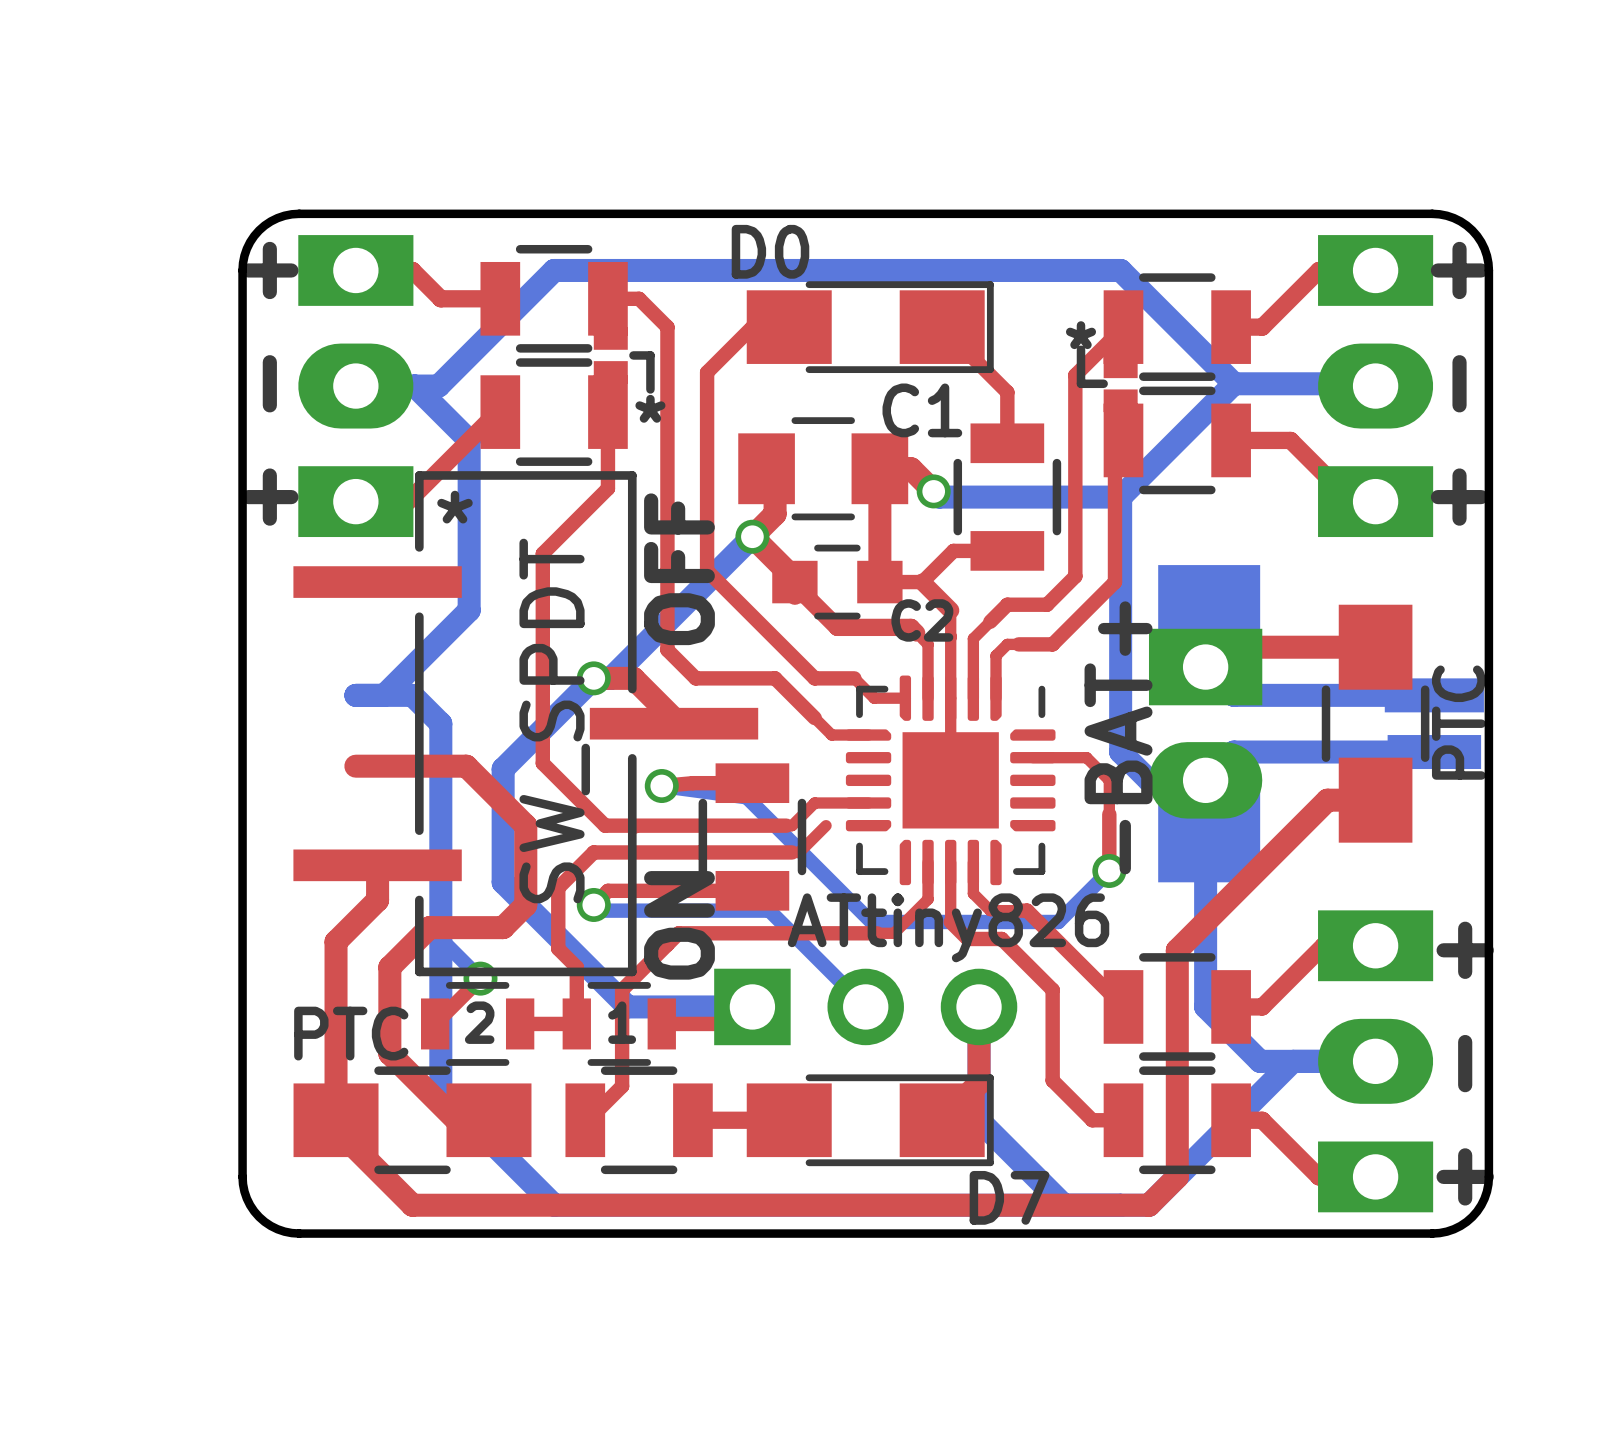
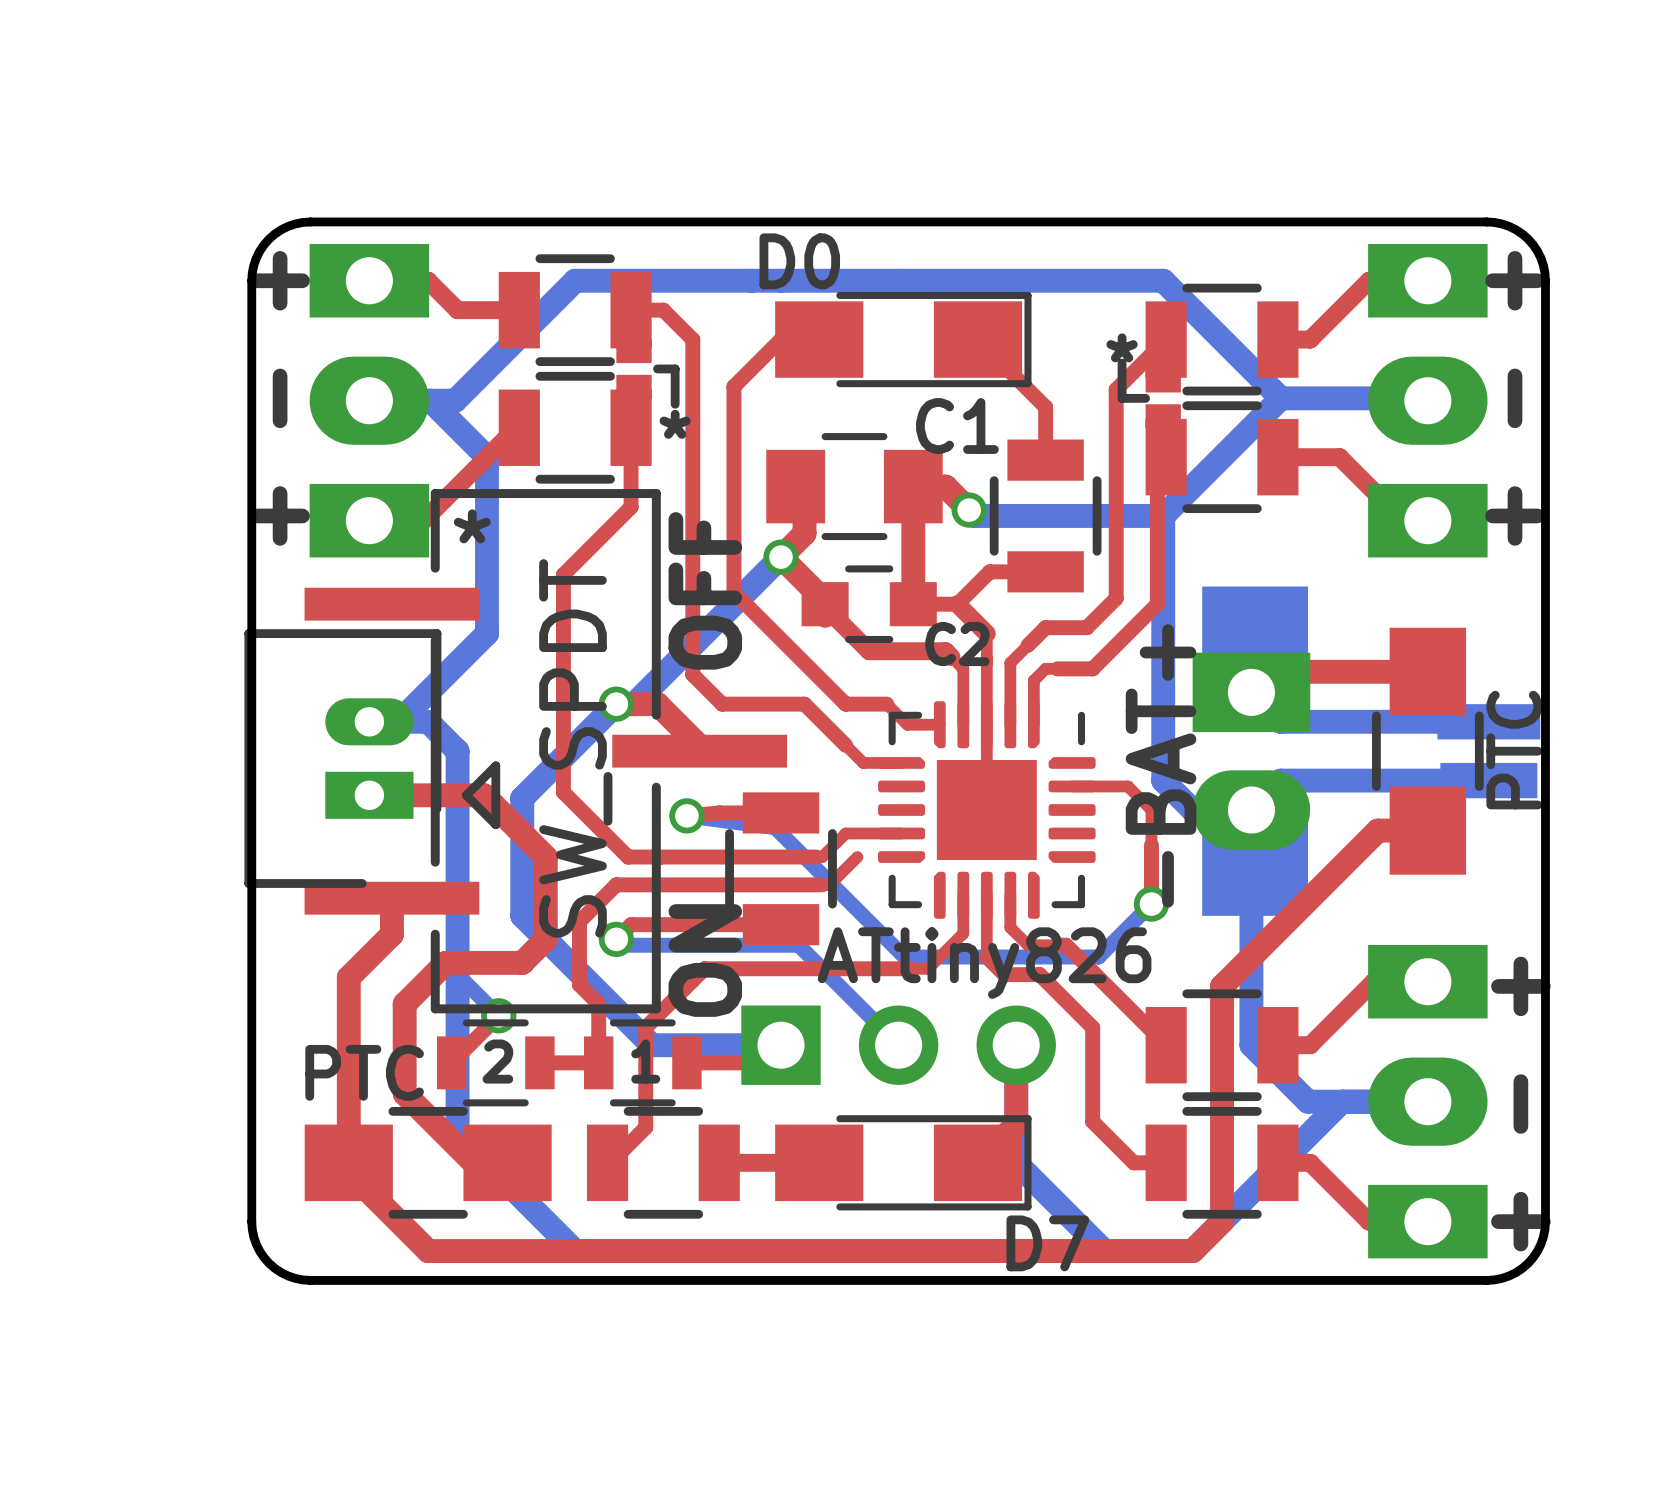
part: none -> (372, 758)

